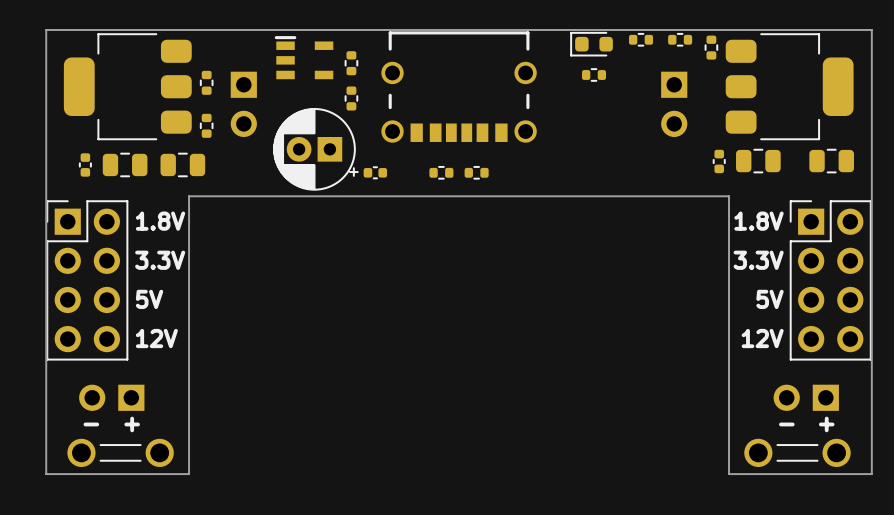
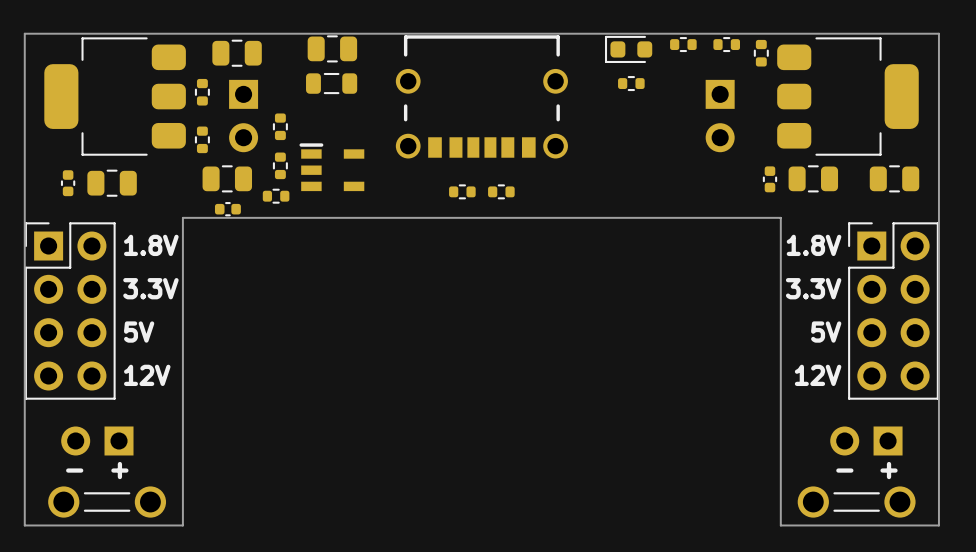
part: none -> (332, 48)
part: none -> (237, 53)
part: (304, 57) -> none
part: (351, 63) -> none
part: none -> (331, 83)
part: (351, 98) -> none
part footprint: [273, 108, 359, 191] -> [299, 143, 365, 192]
part: none -> (280, 126)
part: none -> (280, 165)
part position: (182, 164) -> (227, 178)
part position: (375, 172) -> (227, 209)
part: none -> (276, 196)

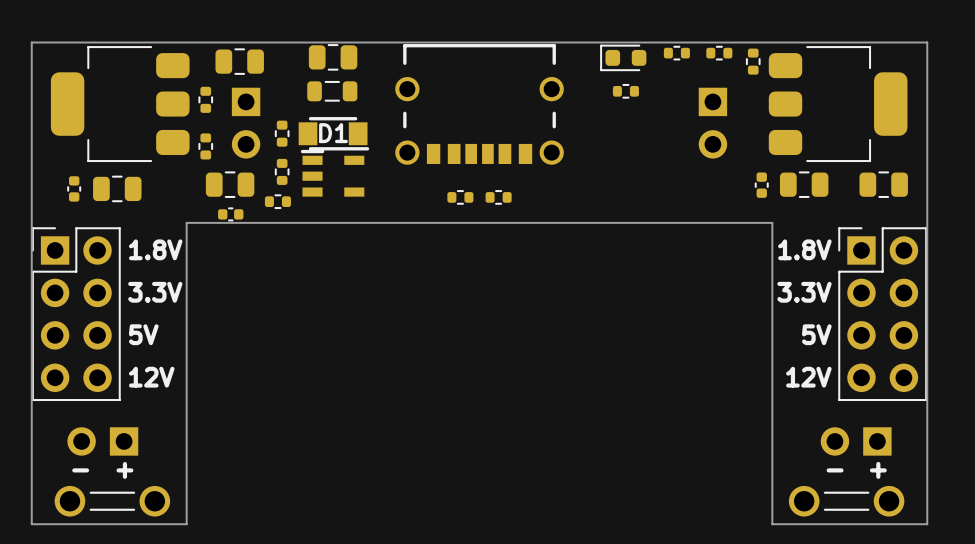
D1: none -> (333, 133)

